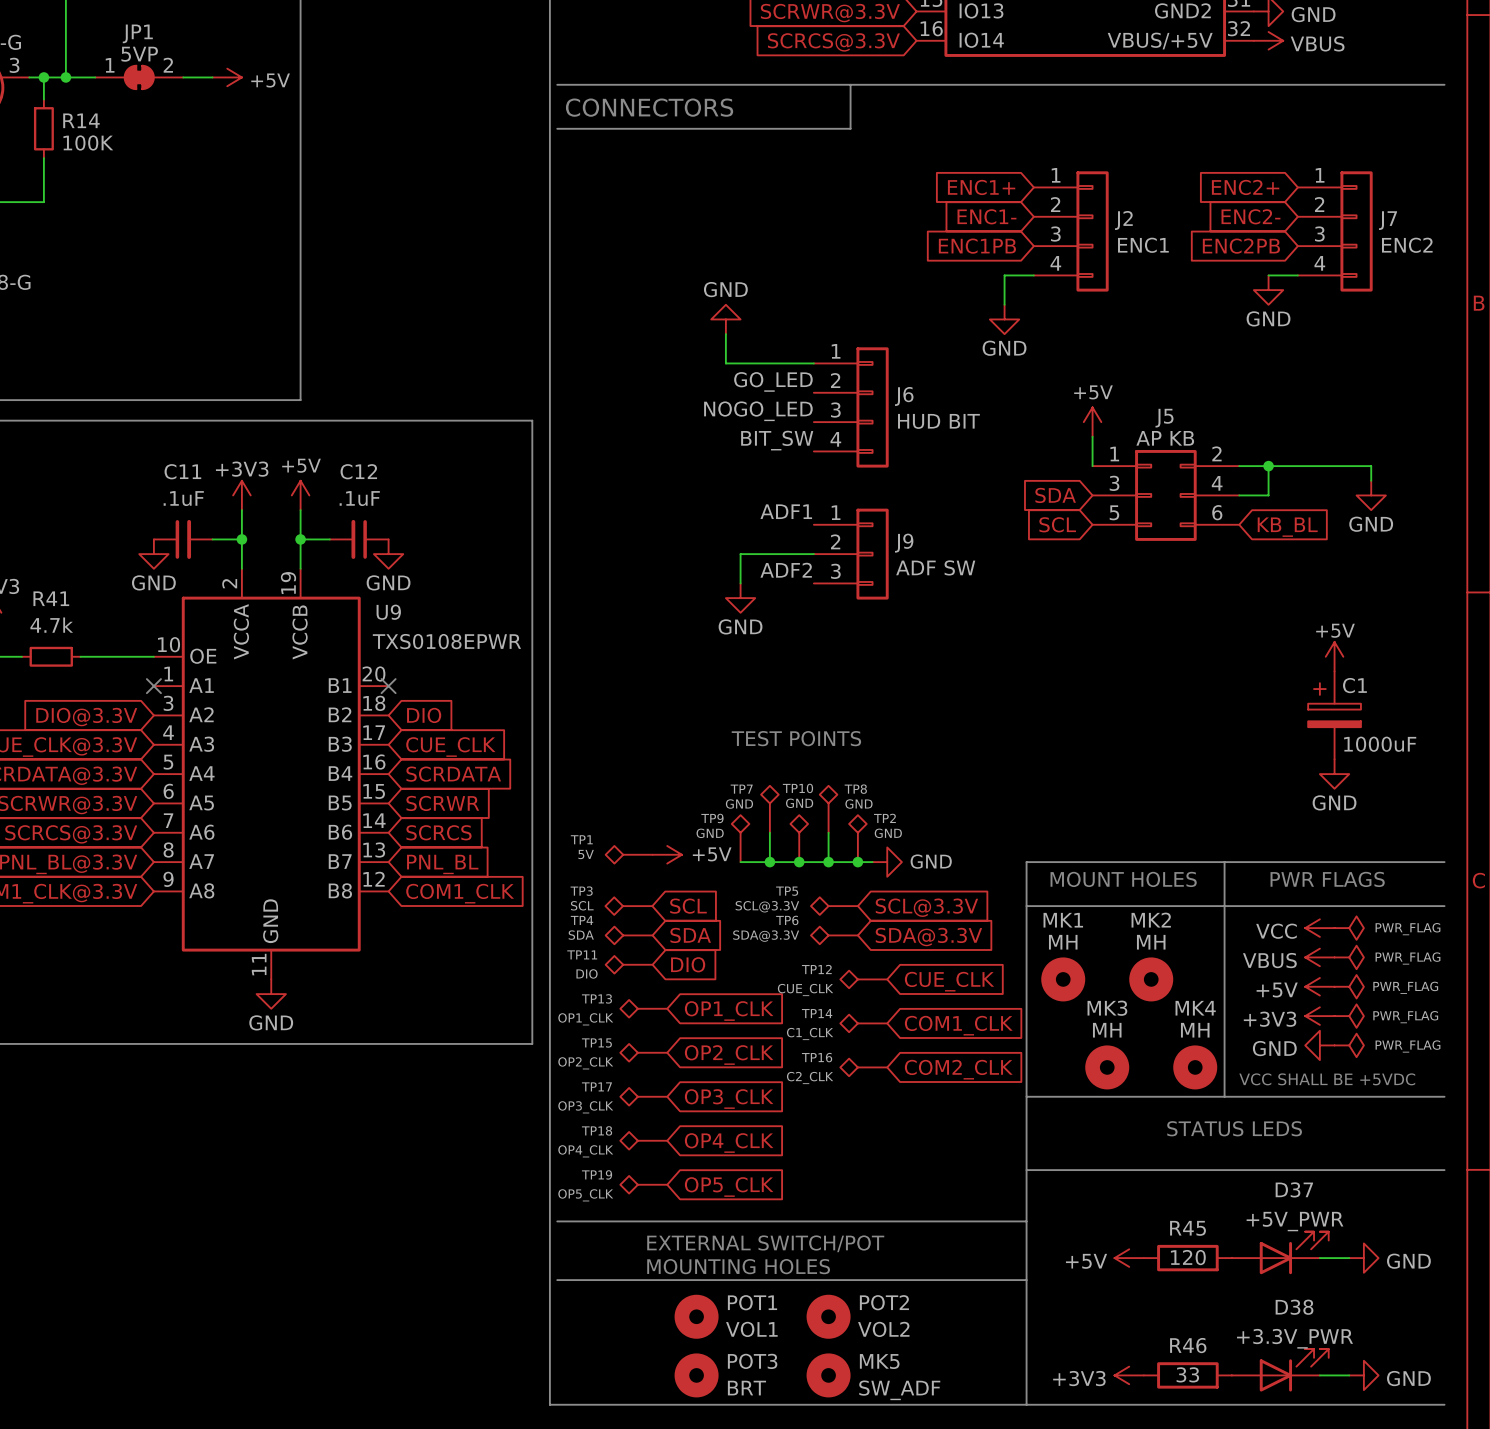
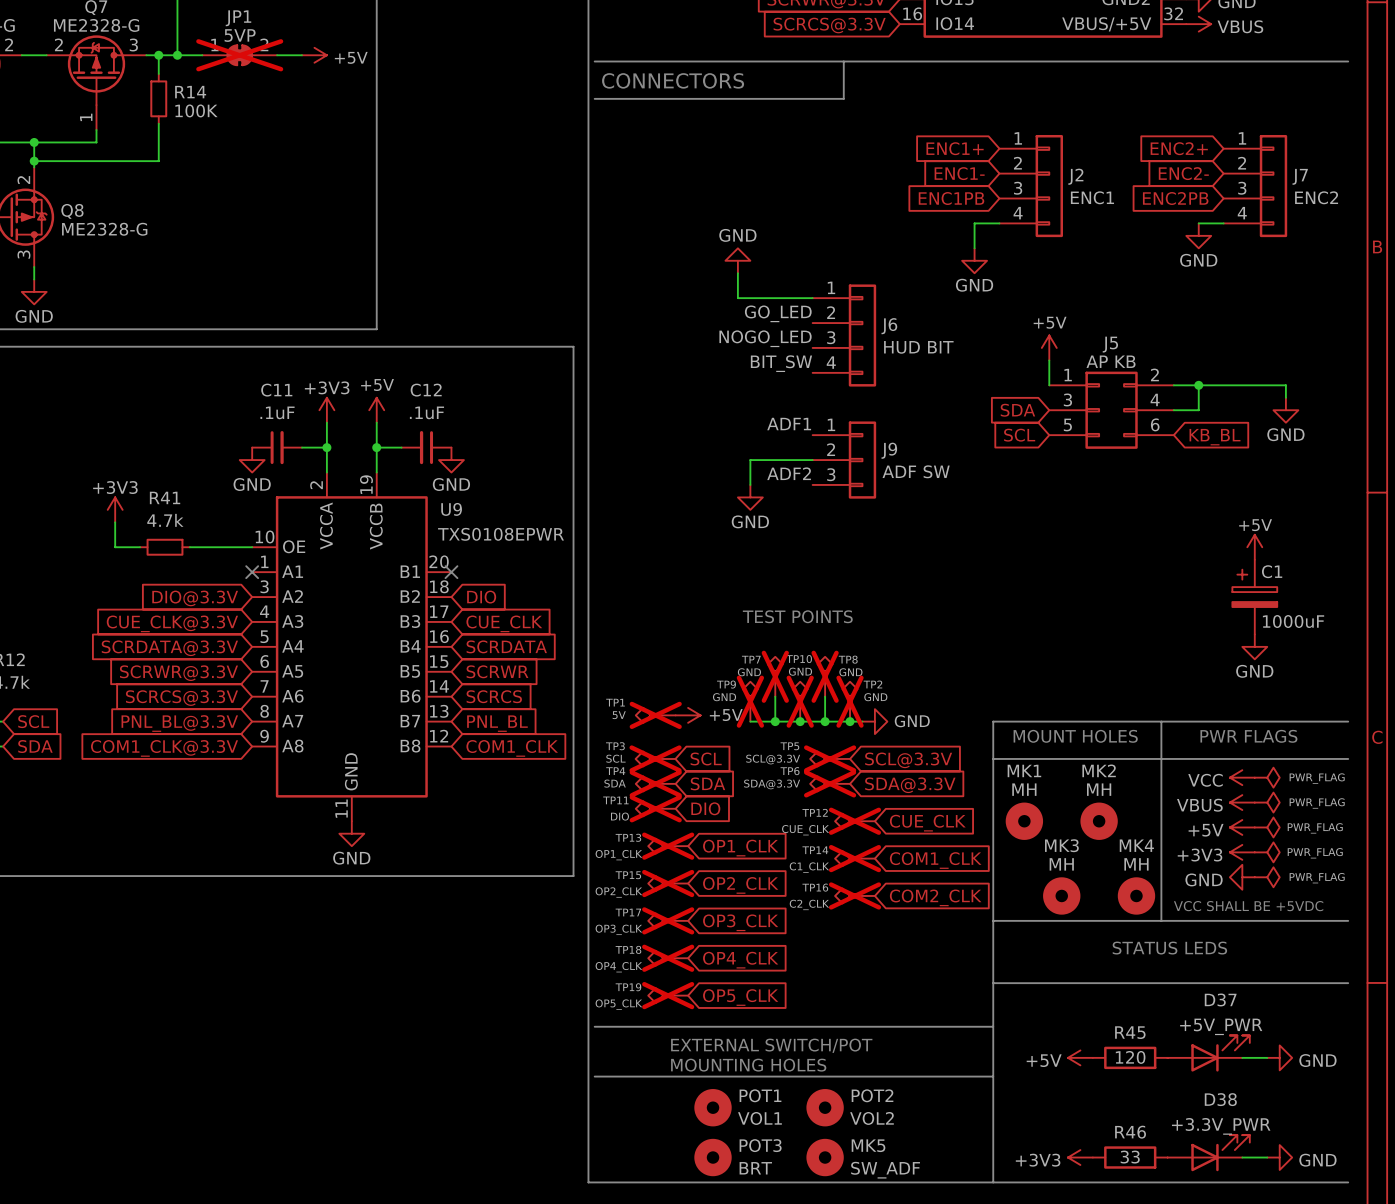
JP1 do-not-place cross: none -> (239, 55)
TP7 do-not-place cross: none -> (775, 676)
TP8 do-not-place cross: none -> (825, 676)
TP9 do-not-place cross: none -> (750, 701)
TP10 do-not-place cross: none -> (800, 701)
TP2 do-not-place cross: none -> (850, 701)
TP1 do-not-place cross: none -> (655, 715)
TP3 do-not-place cross: none -> (655, 758)
TP5 do-not-place cross: none -> (830, 758)
TP4 do-not-place cross: none -> (655, 783)
TP6 do-not-place cross: none -> (830, 783)
TP11 do-not-place cross: none -> (655, 808)
TP12 do-not-place cross: none -> (854, 821)
TP13 do-not-place cross: none -> (668, 846)
TP14 do-not-place cross: none -> (854, 858)
TP15 do-not-place cross: none -> (668, 883)
TP16 do-not-place cross: none -> (854, 895)
TP17 do-not-place cross: none -> (668, 920)
TP18 do-not-place cross: none -> (668, 958)
TP19 do-not-place cross: none -> (668, 995)

